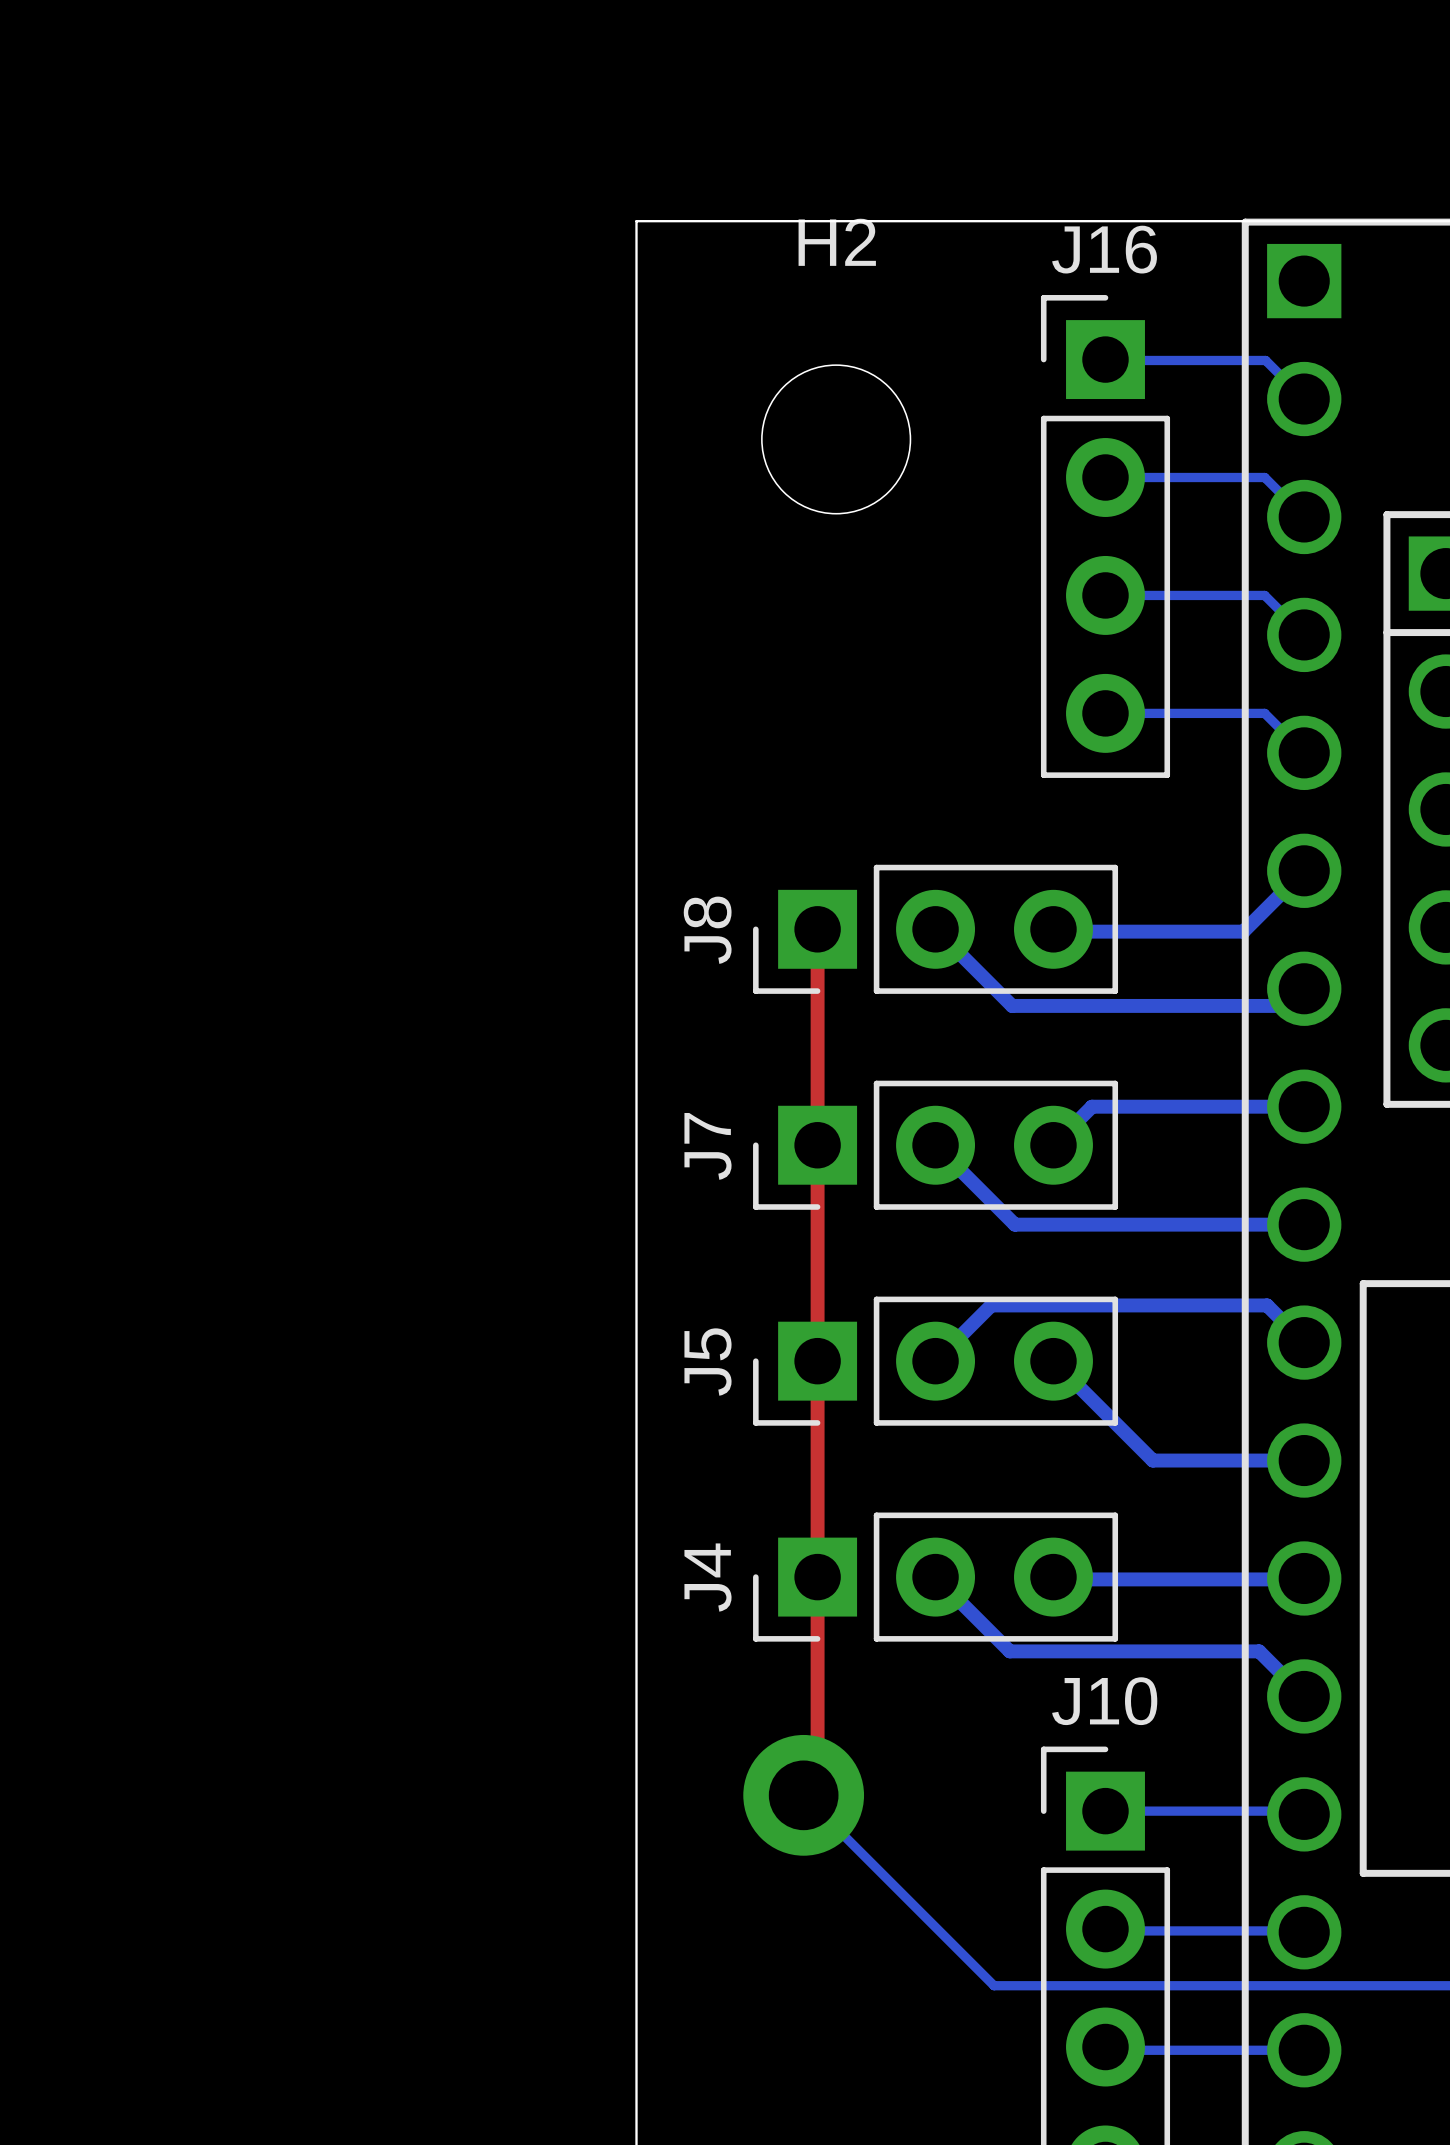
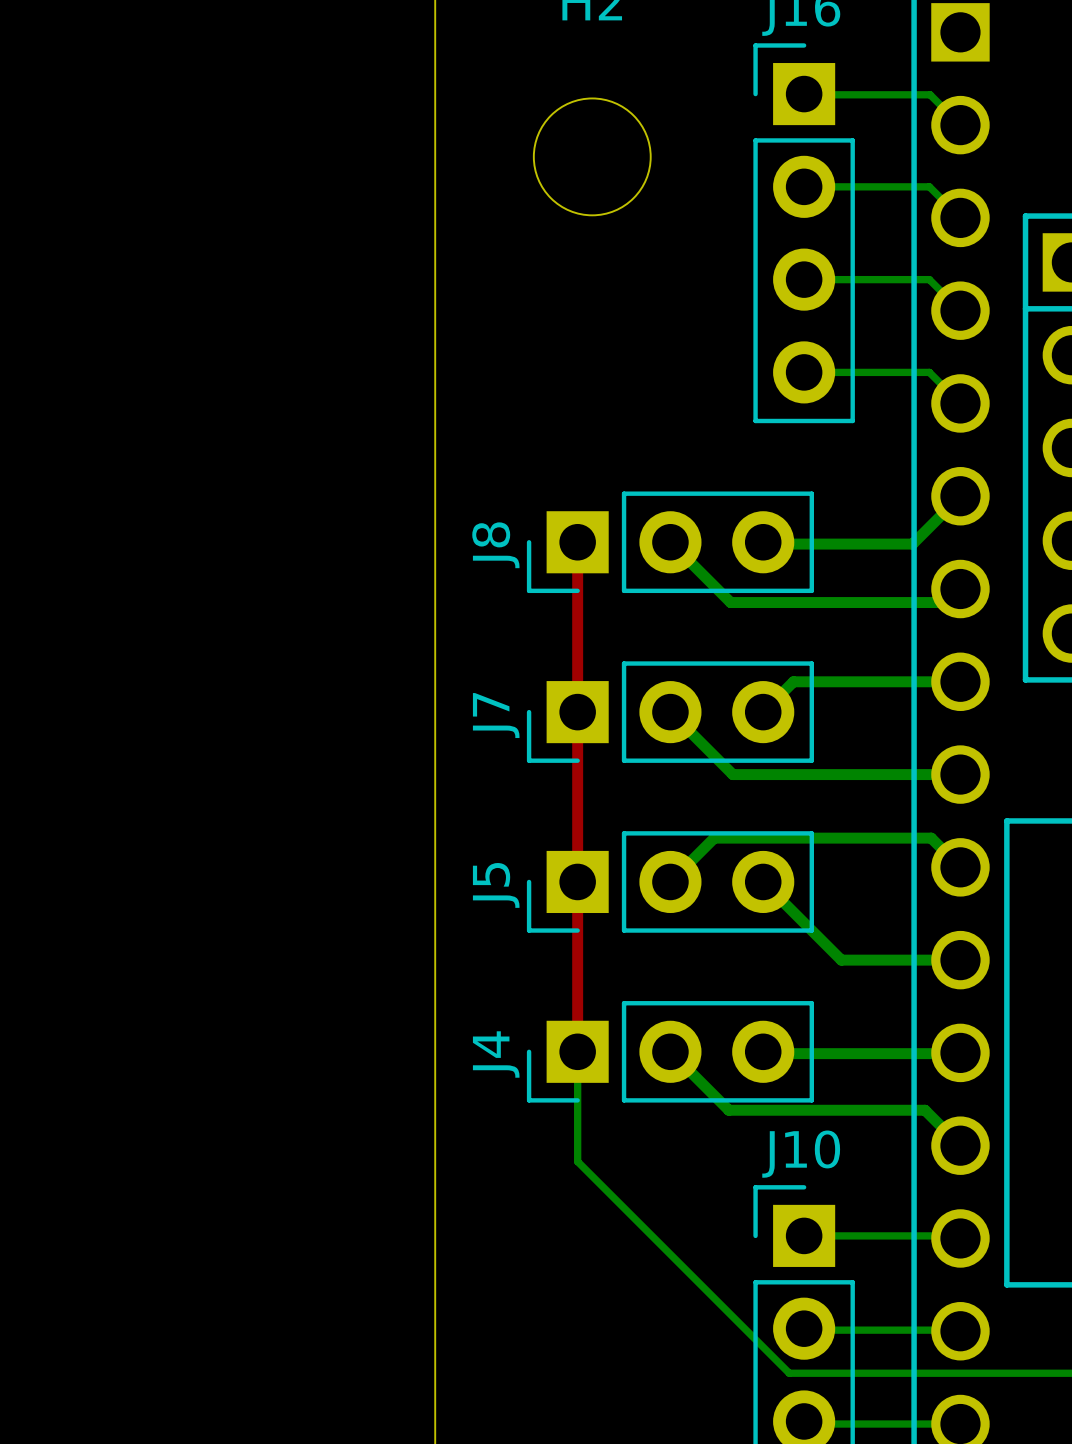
top track: (817, 1577) (817, 1781) (803, 1795) -> none
bottom track: (803, 1795) (994, 1985) (1086, 1985) -> (577, 1051) (577, 1161) (789, 1373)
via: (803, 1795) -> none

